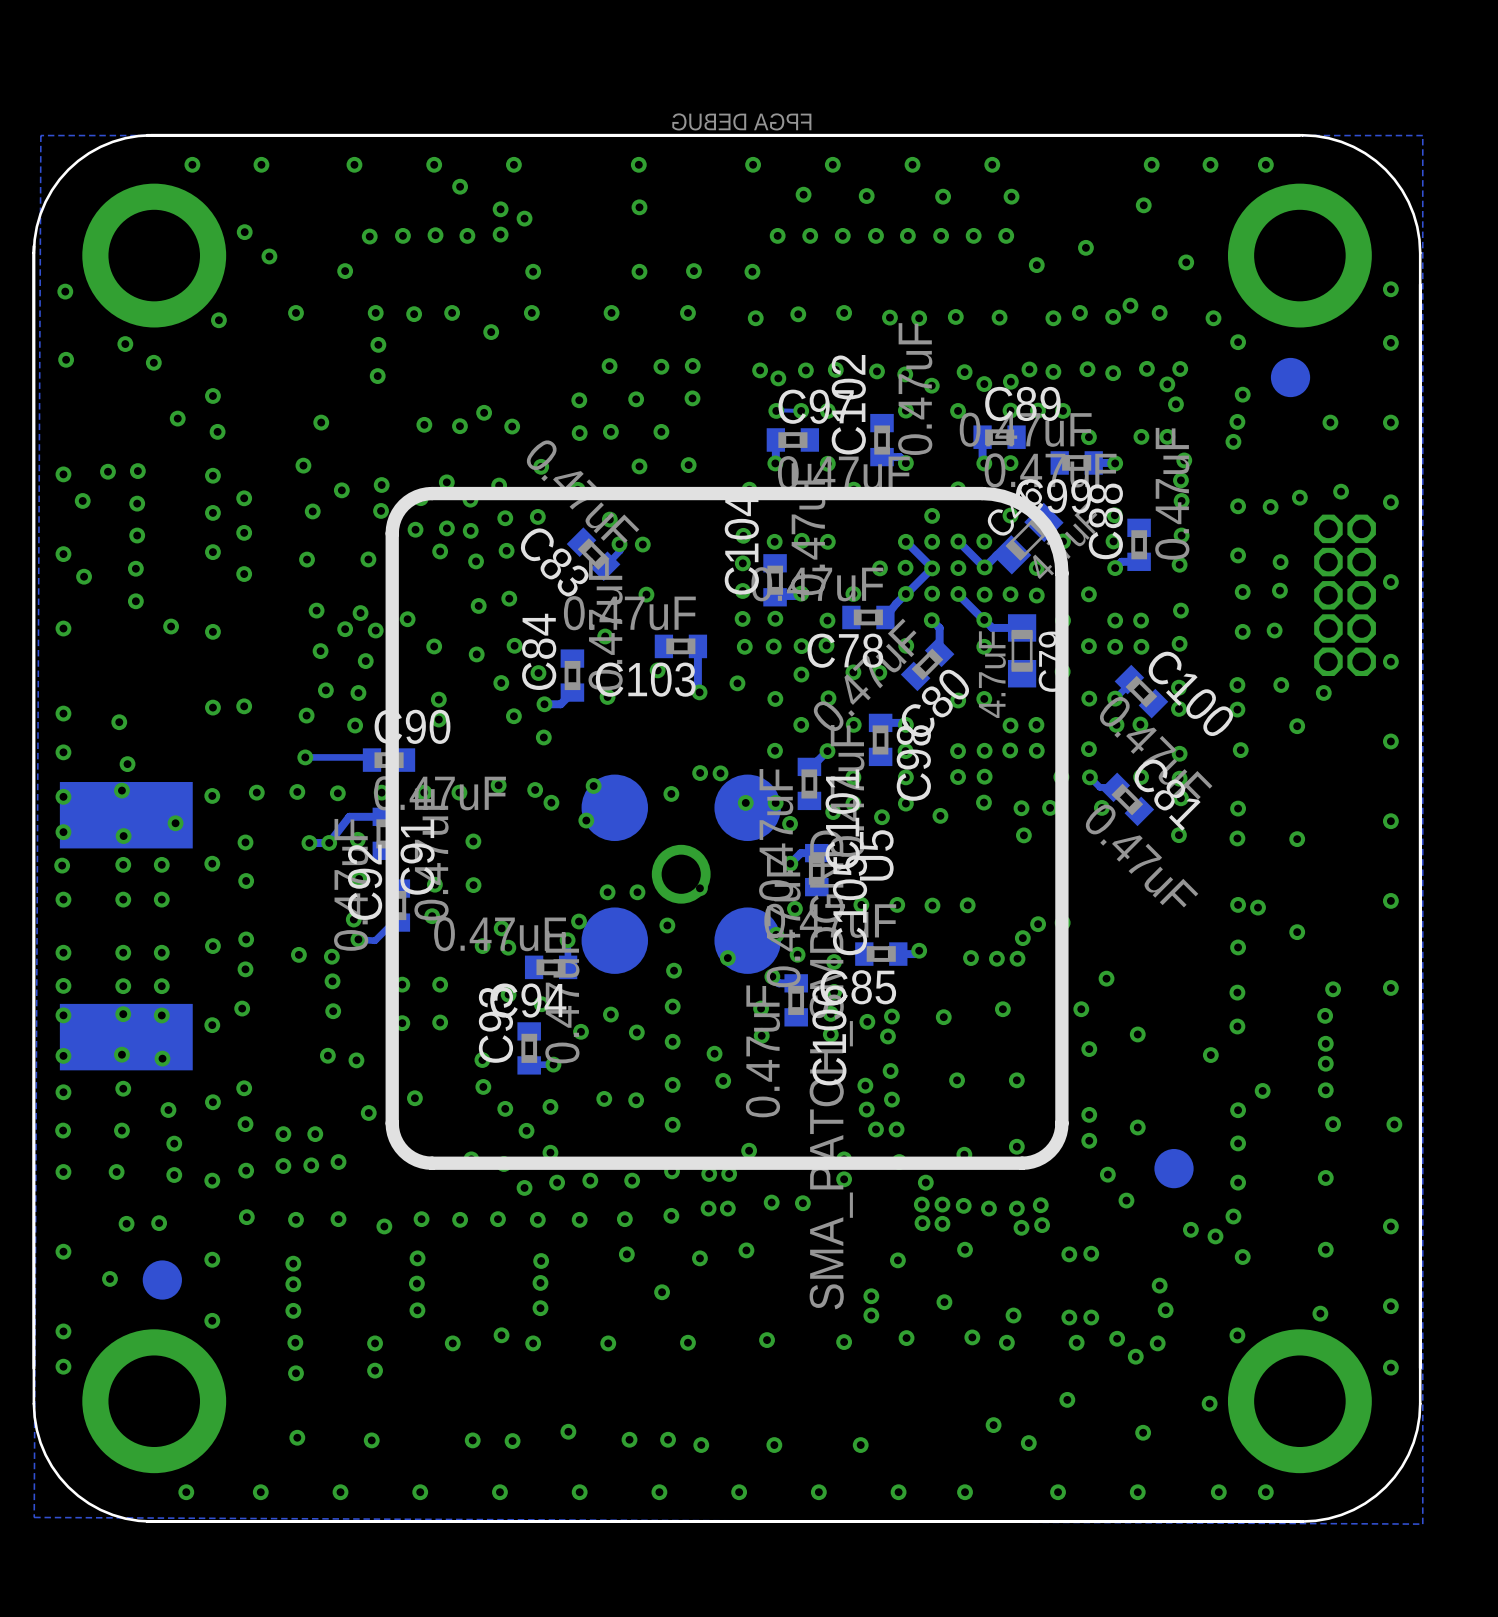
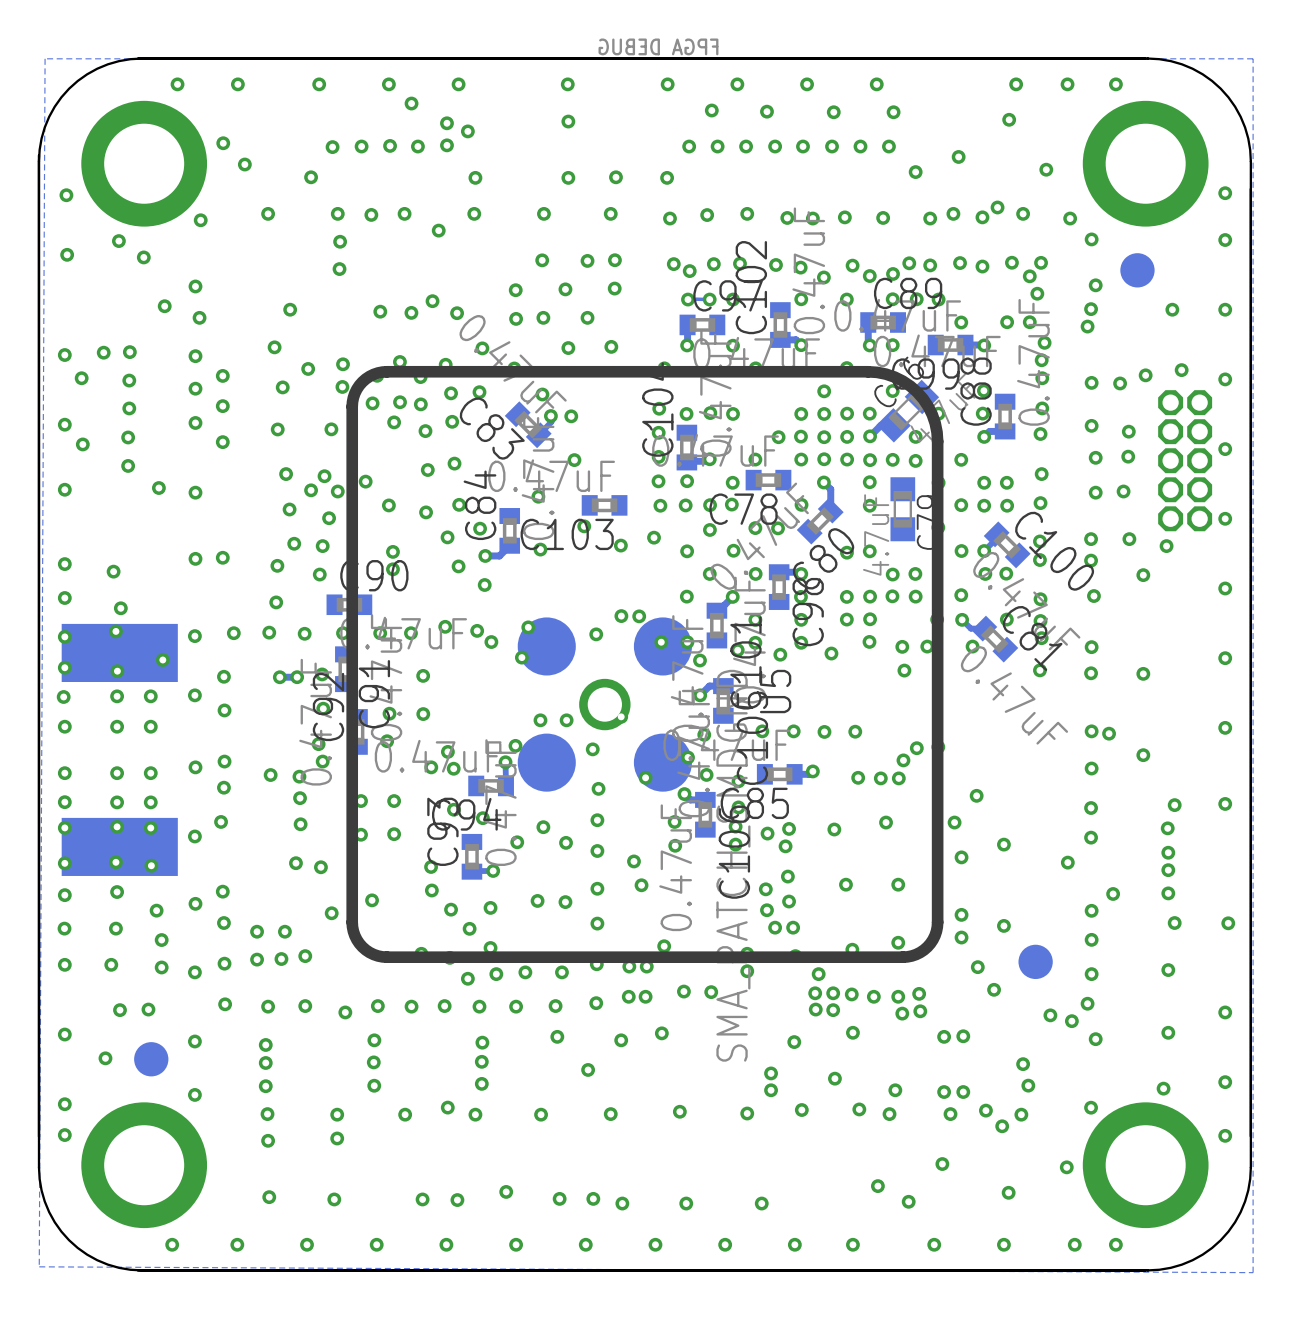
track: (905, 541) (932, 568) -> none
track: (958, 541) (984, 567) -> none
track: (932, 568) (896, 603) (885, 617) -> none
track: (958, 593) (983, 619) -> none
track: (984, 619) (992, 627) (1022, 627) -> none
track: (697, 646) (697, 690) (699, 692) -> none
track: (305, 757) (369, 757) (372, 760) -> none
track: (378, 816) (384, 816) (349, 816) (329, 842) -> none
track: (398, 922) (393, 922) (375, 940) (358, 939) -> none

